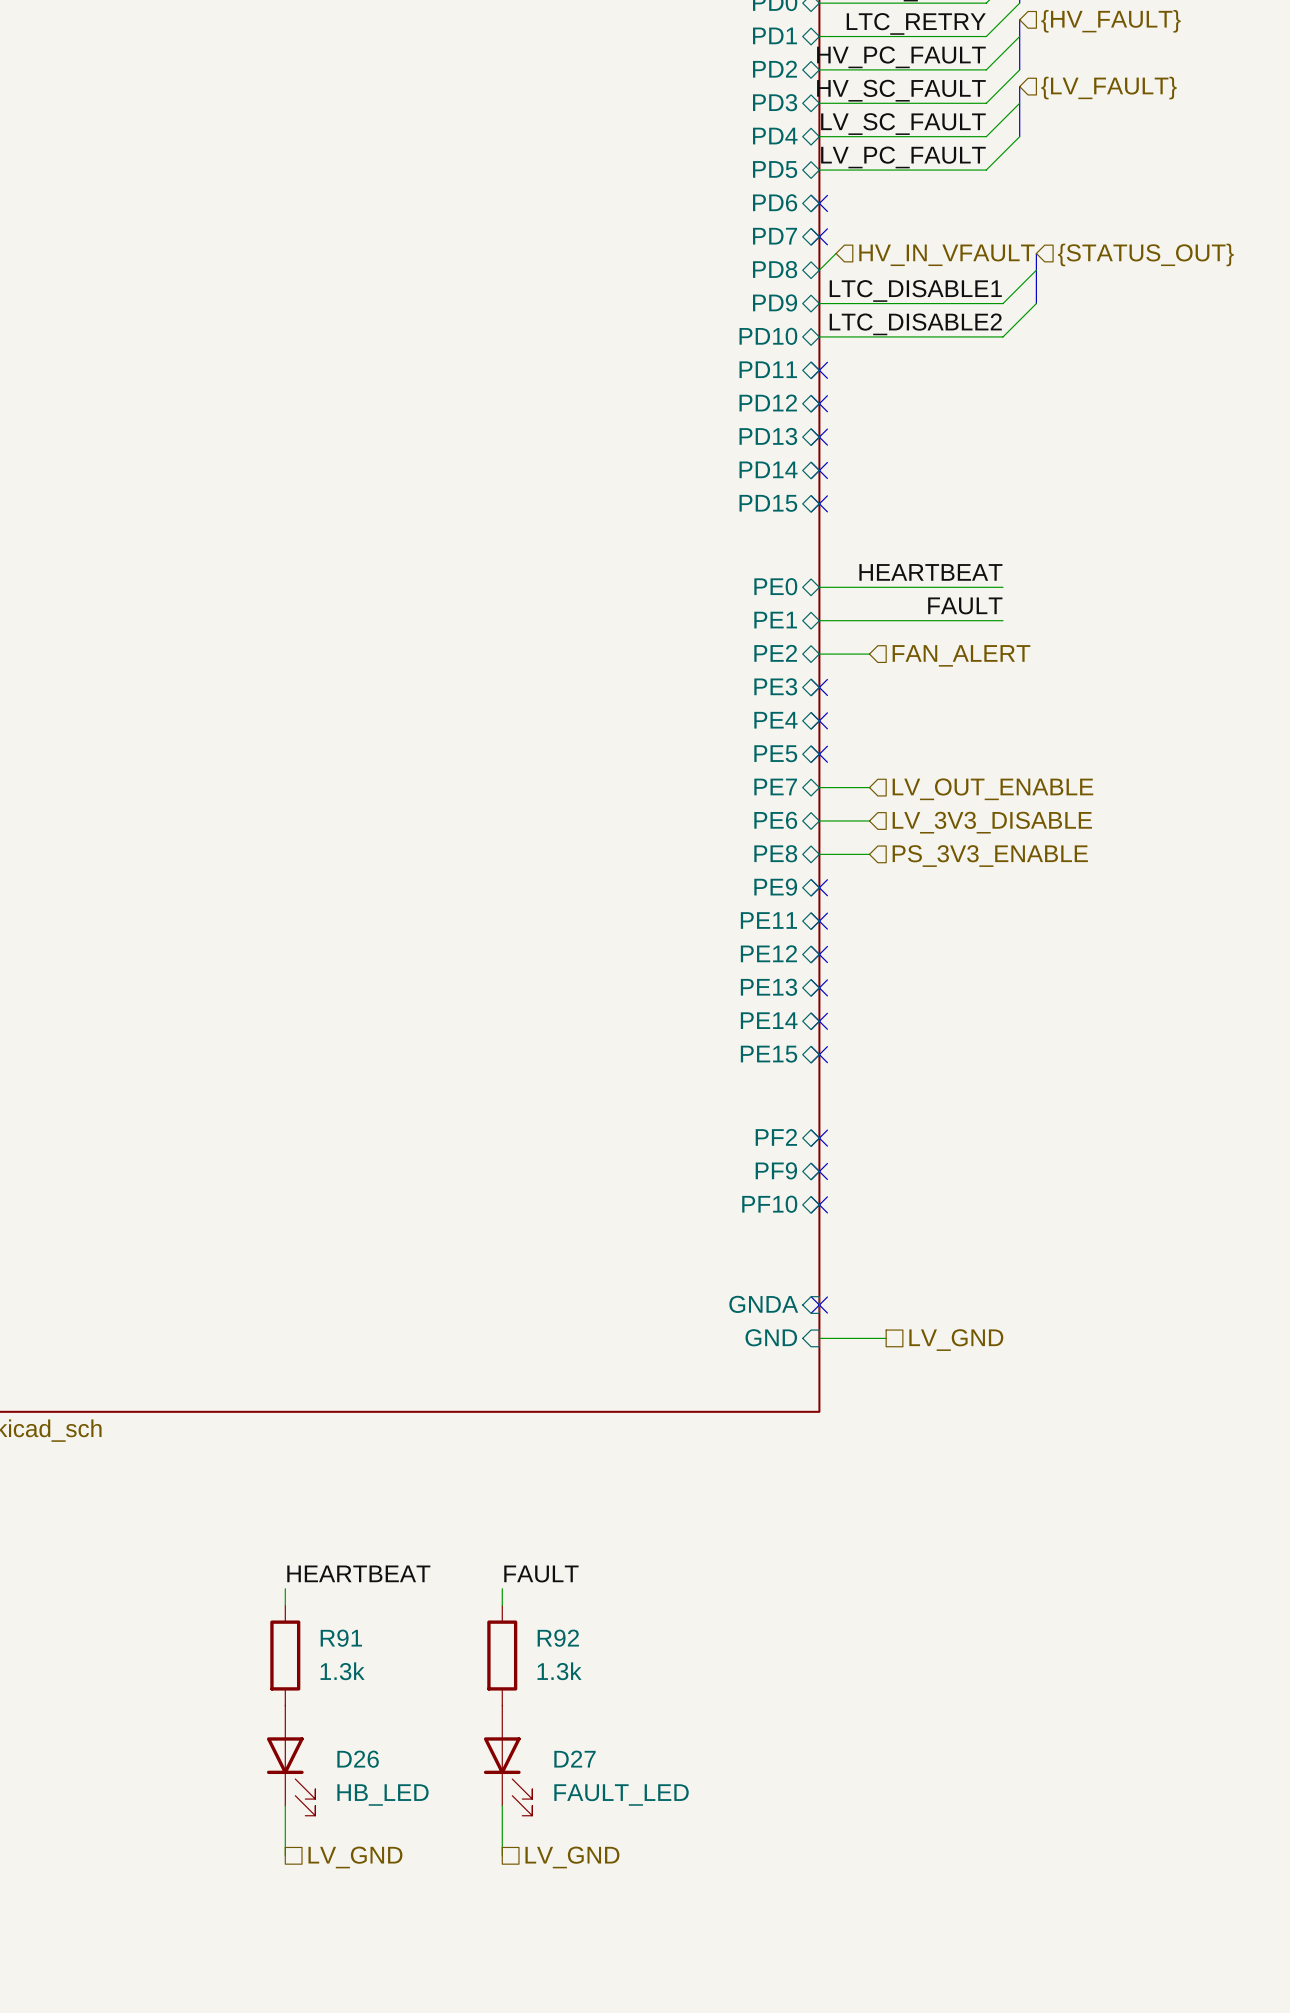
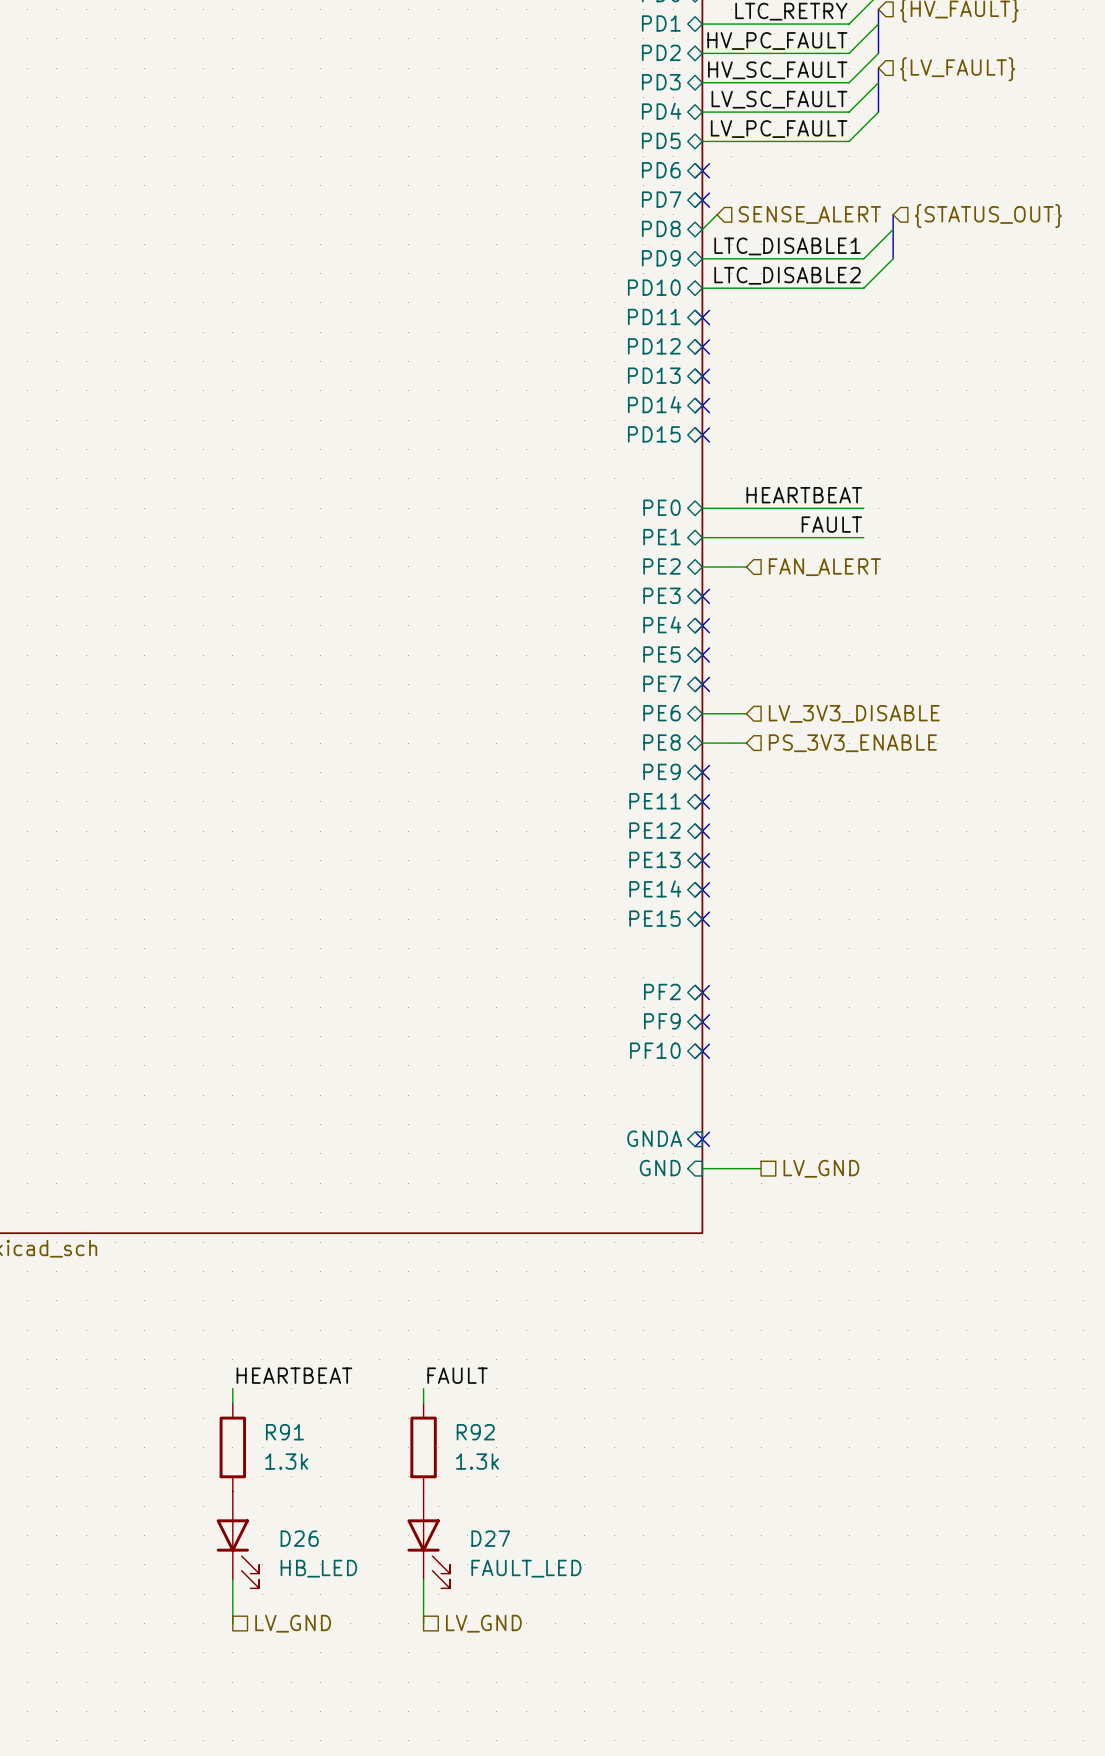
hierarchical label: HV_IN_VFAULT (946, 255) -> SENSE_ALERT (809, 214)
wire: (819, 787) (869, 787) -> none
no-connect mark: none -> (702, 684)
hierarchical label: LV_OUT_ENABLE (992, 789) -> none

